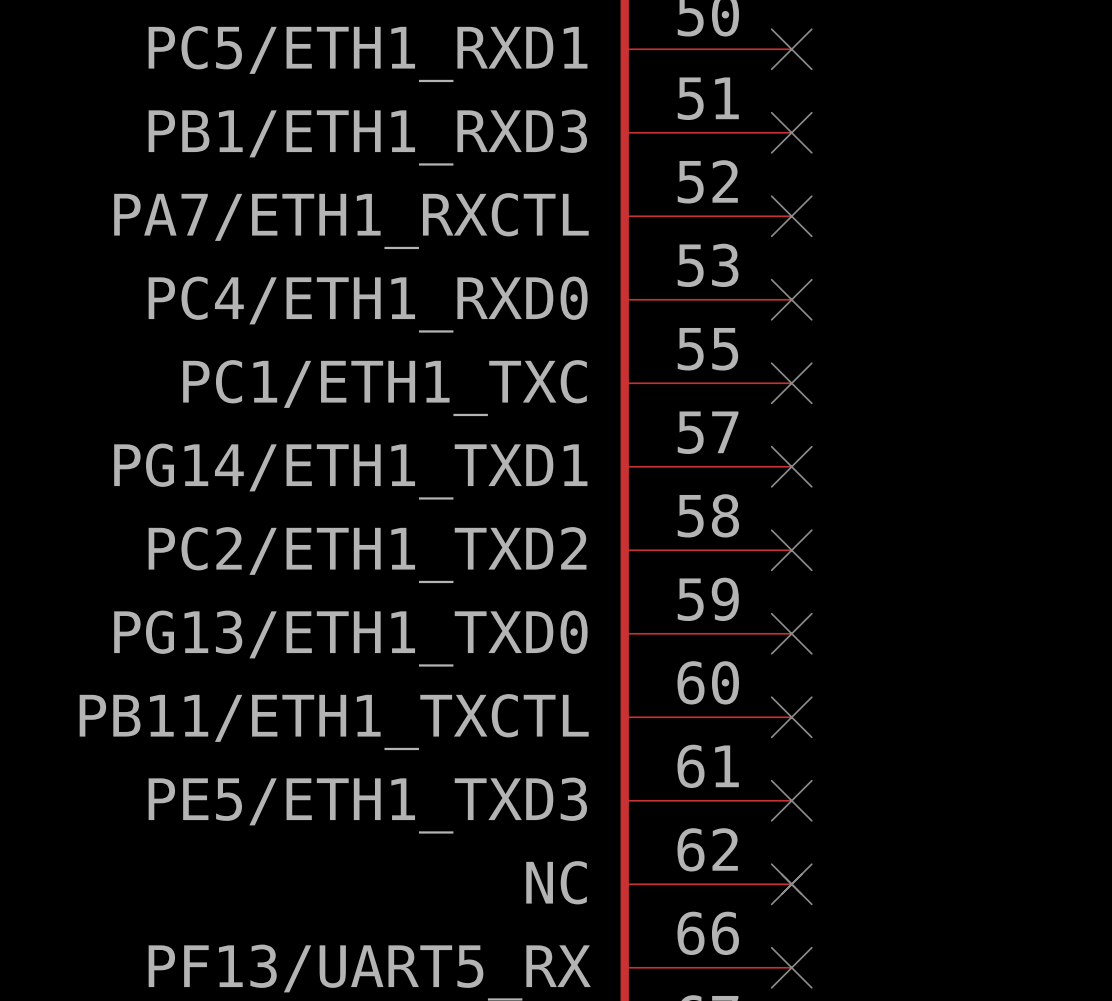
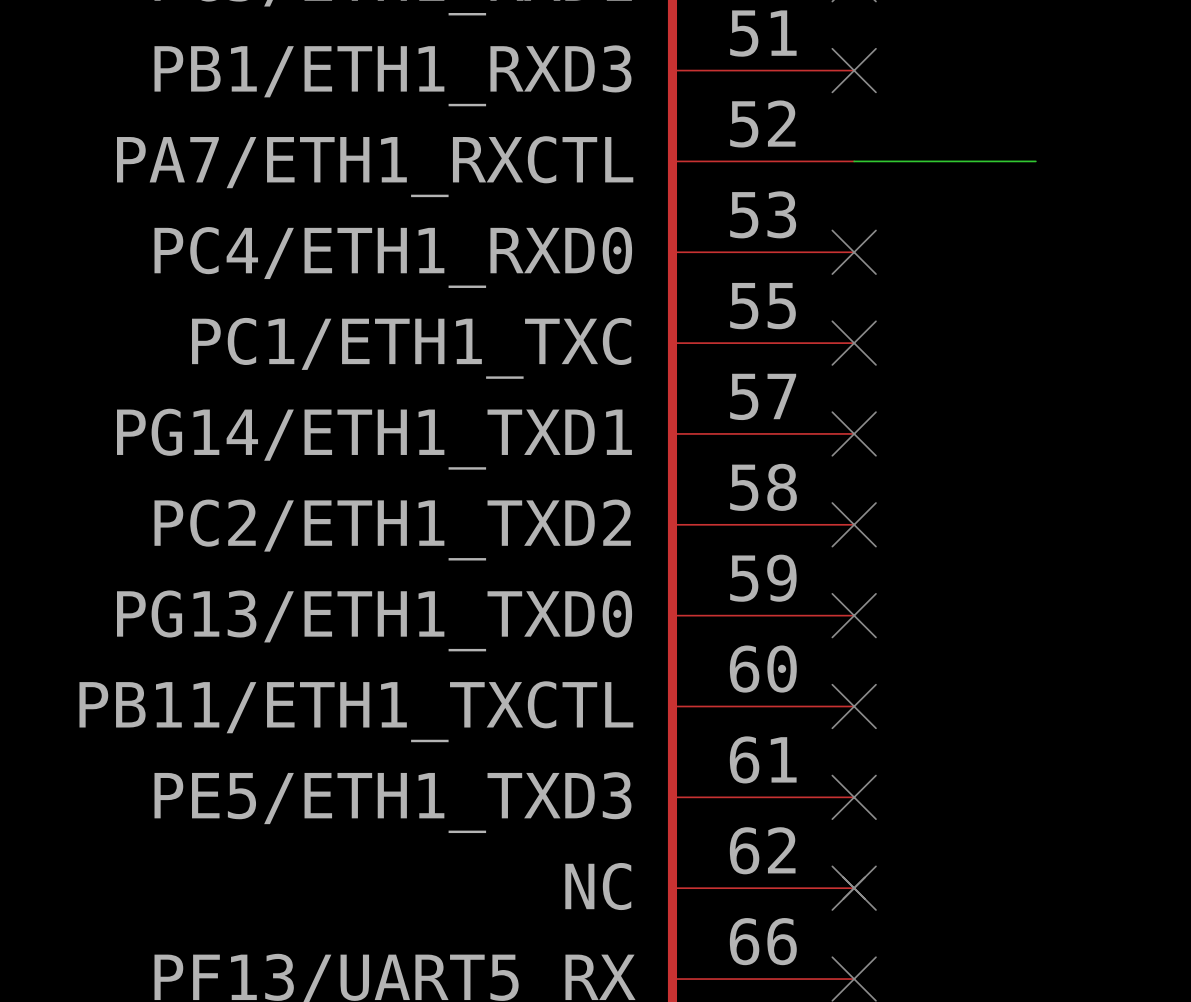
wire: none -> (854, 161) (1035, 161)
no-connect mark: (791, 216) -> none

